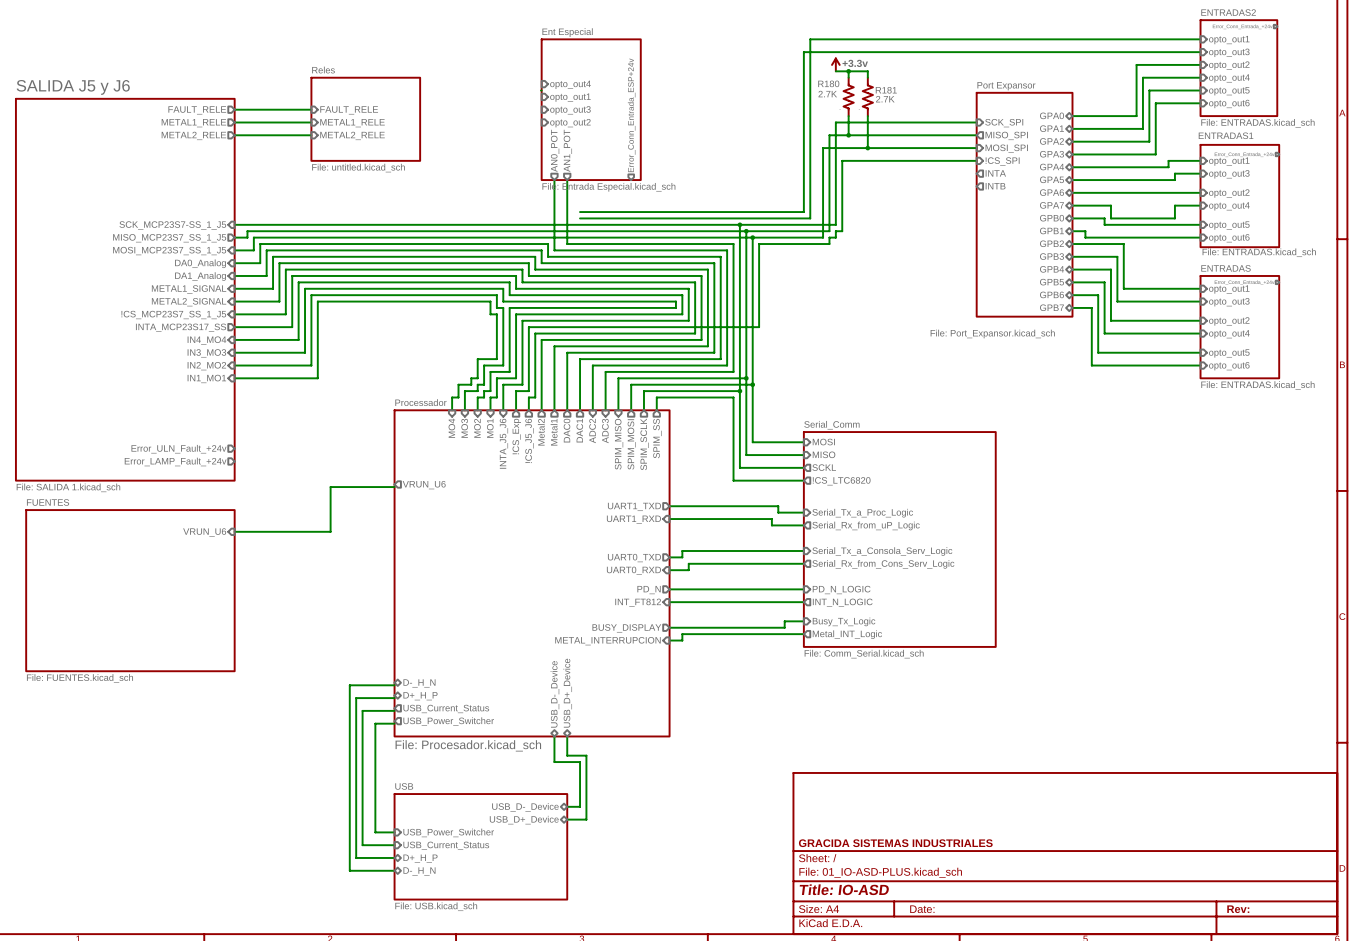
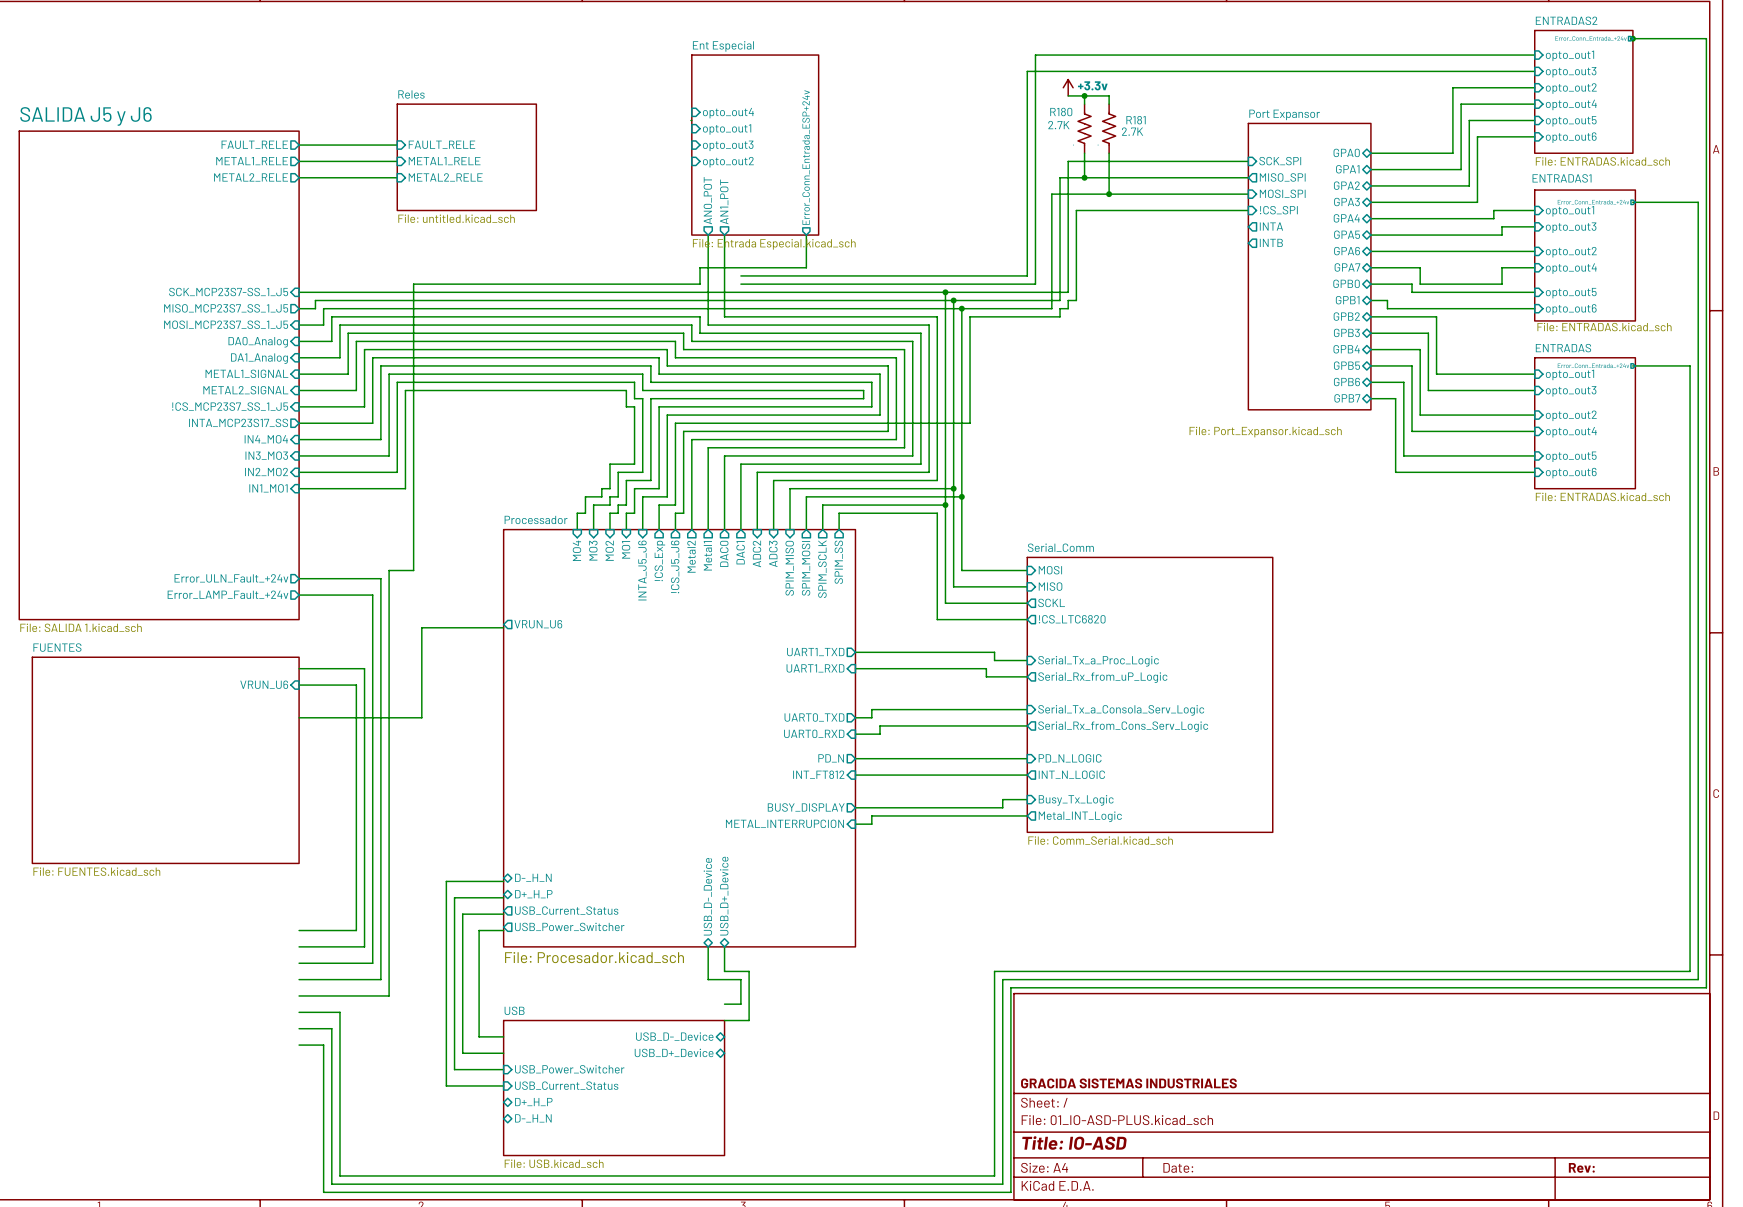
wire: none -> (1632, 38) (1706, 38) (1706, 987) (1010, 987) (1010, 1192) (323, 1192) (323, 1045) (299, 1045)
junction: none -> (1632, 38)
wire: none -> (1632, 202) (1698, 202) (1698, 979) (1002, 979) (1002, 1184) (331, 1184) (331, 1028) (299, 1028)
wire: none -> (806, 235) (806, 267) (700, 267) (700, 284) (413, 284) (413, 570) (389, 570) (389, 995) (299, 995)
wire: none -> (1632, 365) (1690, 365) (1690, 971) (994, 971) (994, 1175) (339, 1175) (339, 1012) (299, 1012)
wire: none -> (299, 578) (380, 578) (380, 979) (299, 979)
wire: none -> (299, 595) (372, 595) (372, 963) (299, 963)
wire: none -> (299, 668) (364, 668) (364, 946) (299, 946)
wire: (279, 531) (330, 531) -> (299, 717) (421, 717) (421, 685)
wire: none -> (356, 685) (356, 930) (299, 930)
wire: (580, 781) (580, 806) (567, 806) -> (740, 1004) (724, 1004)
wire: (586, 794) (586, 819) (567, 819) -> (749, 1020) (724, 1020)
wire: (375, 806) (375, 832) -> (479, 1036) (503, 1036)
wire: (362, 819) (362, 845) -> (446, 1085) (462, 1085)
wire: none -> (462, 1053) (503, 1053)
wire: (356, 832) (356, 857) (394, 857) -> (454, 1069) (479, 1069)
wire: (349, 845) (349, 870) (394, 870) -> none

